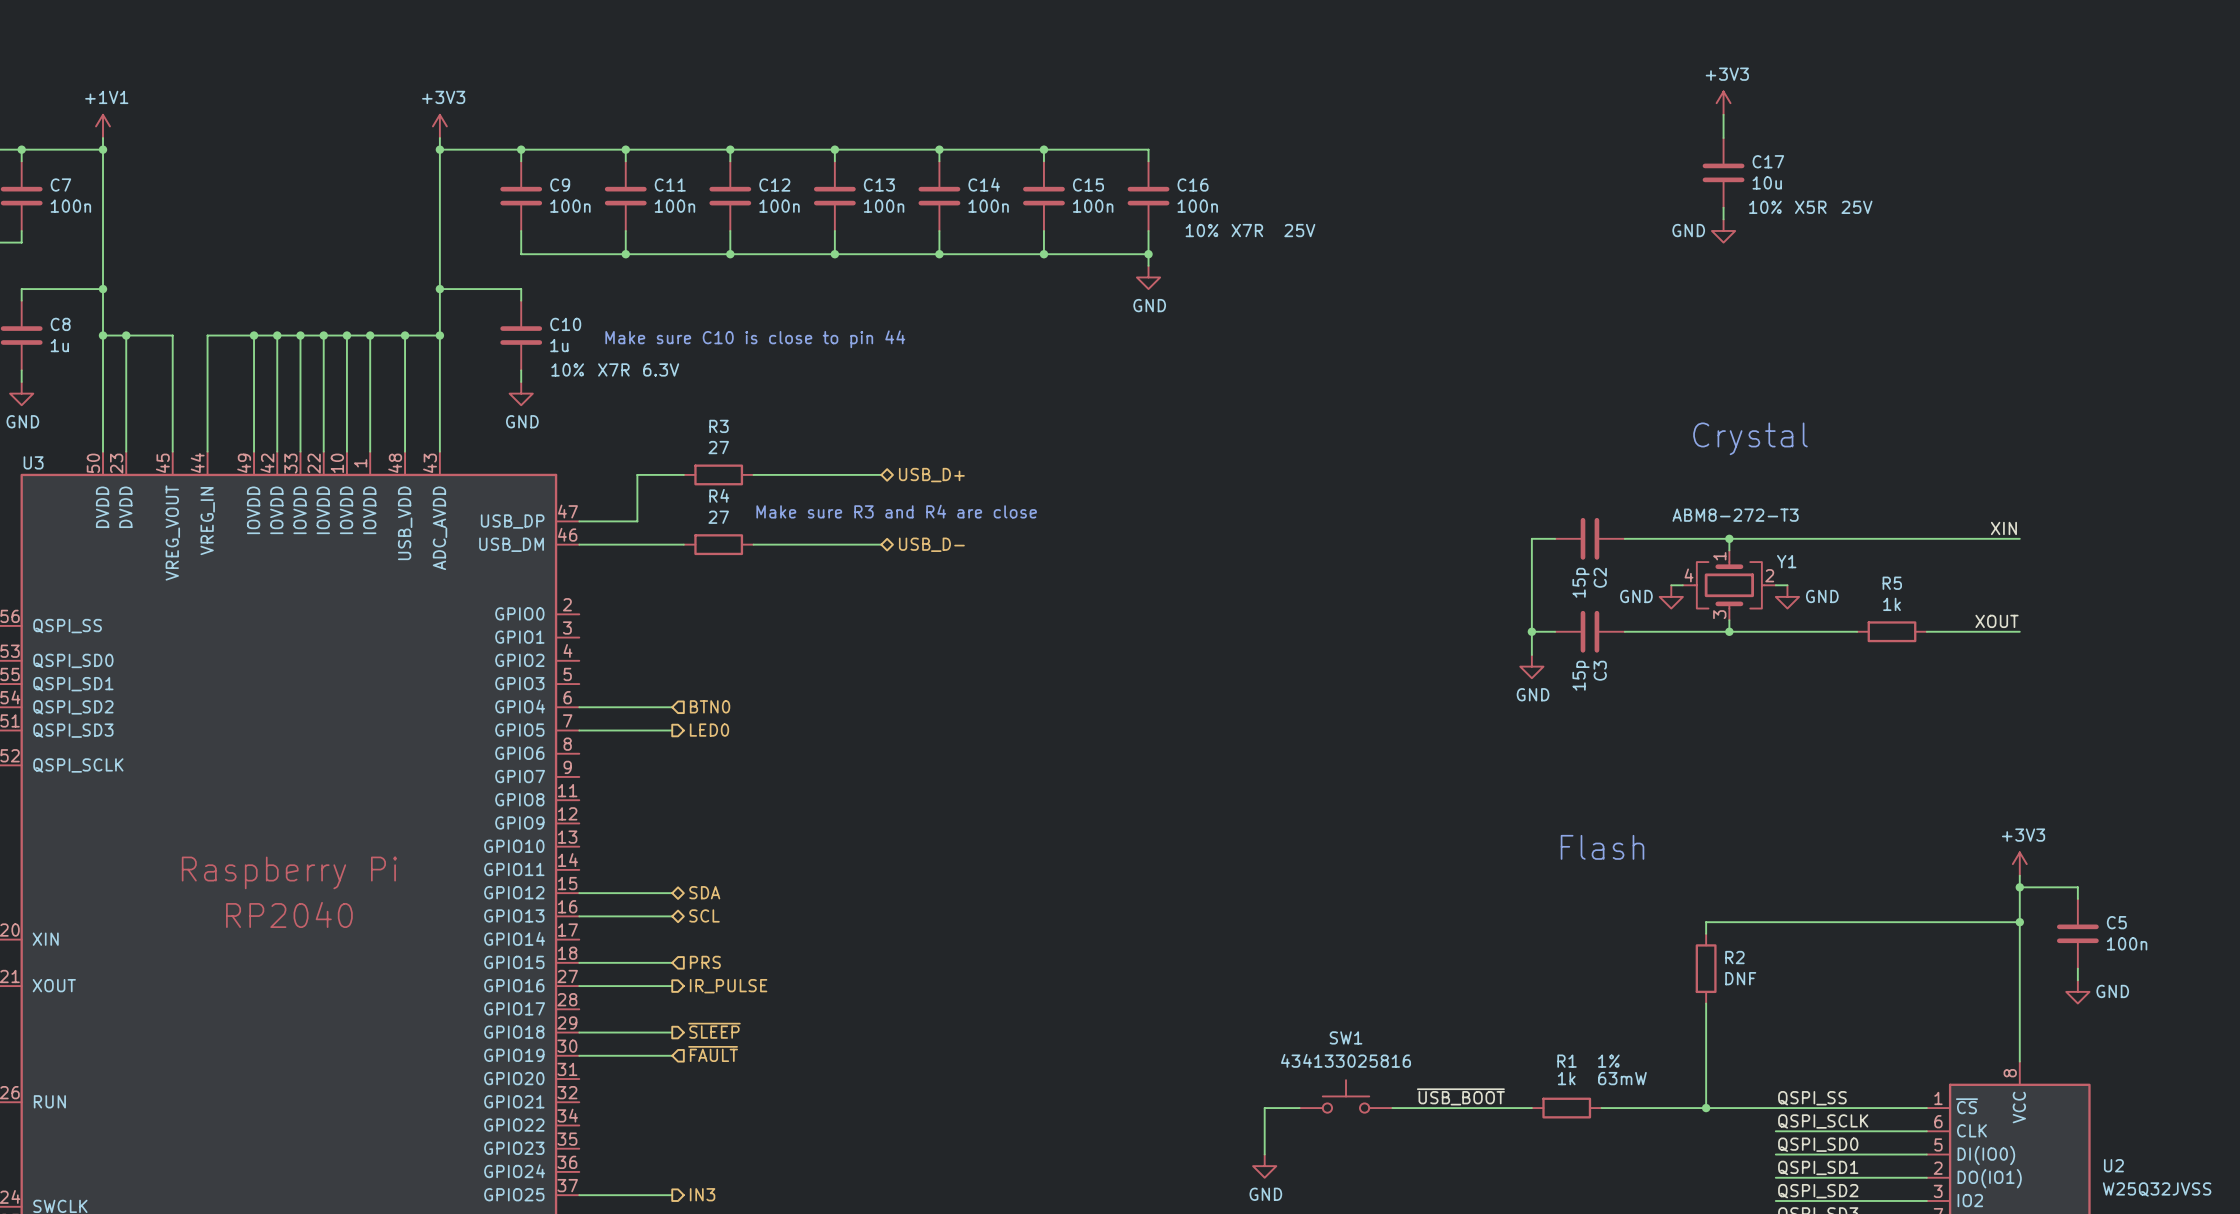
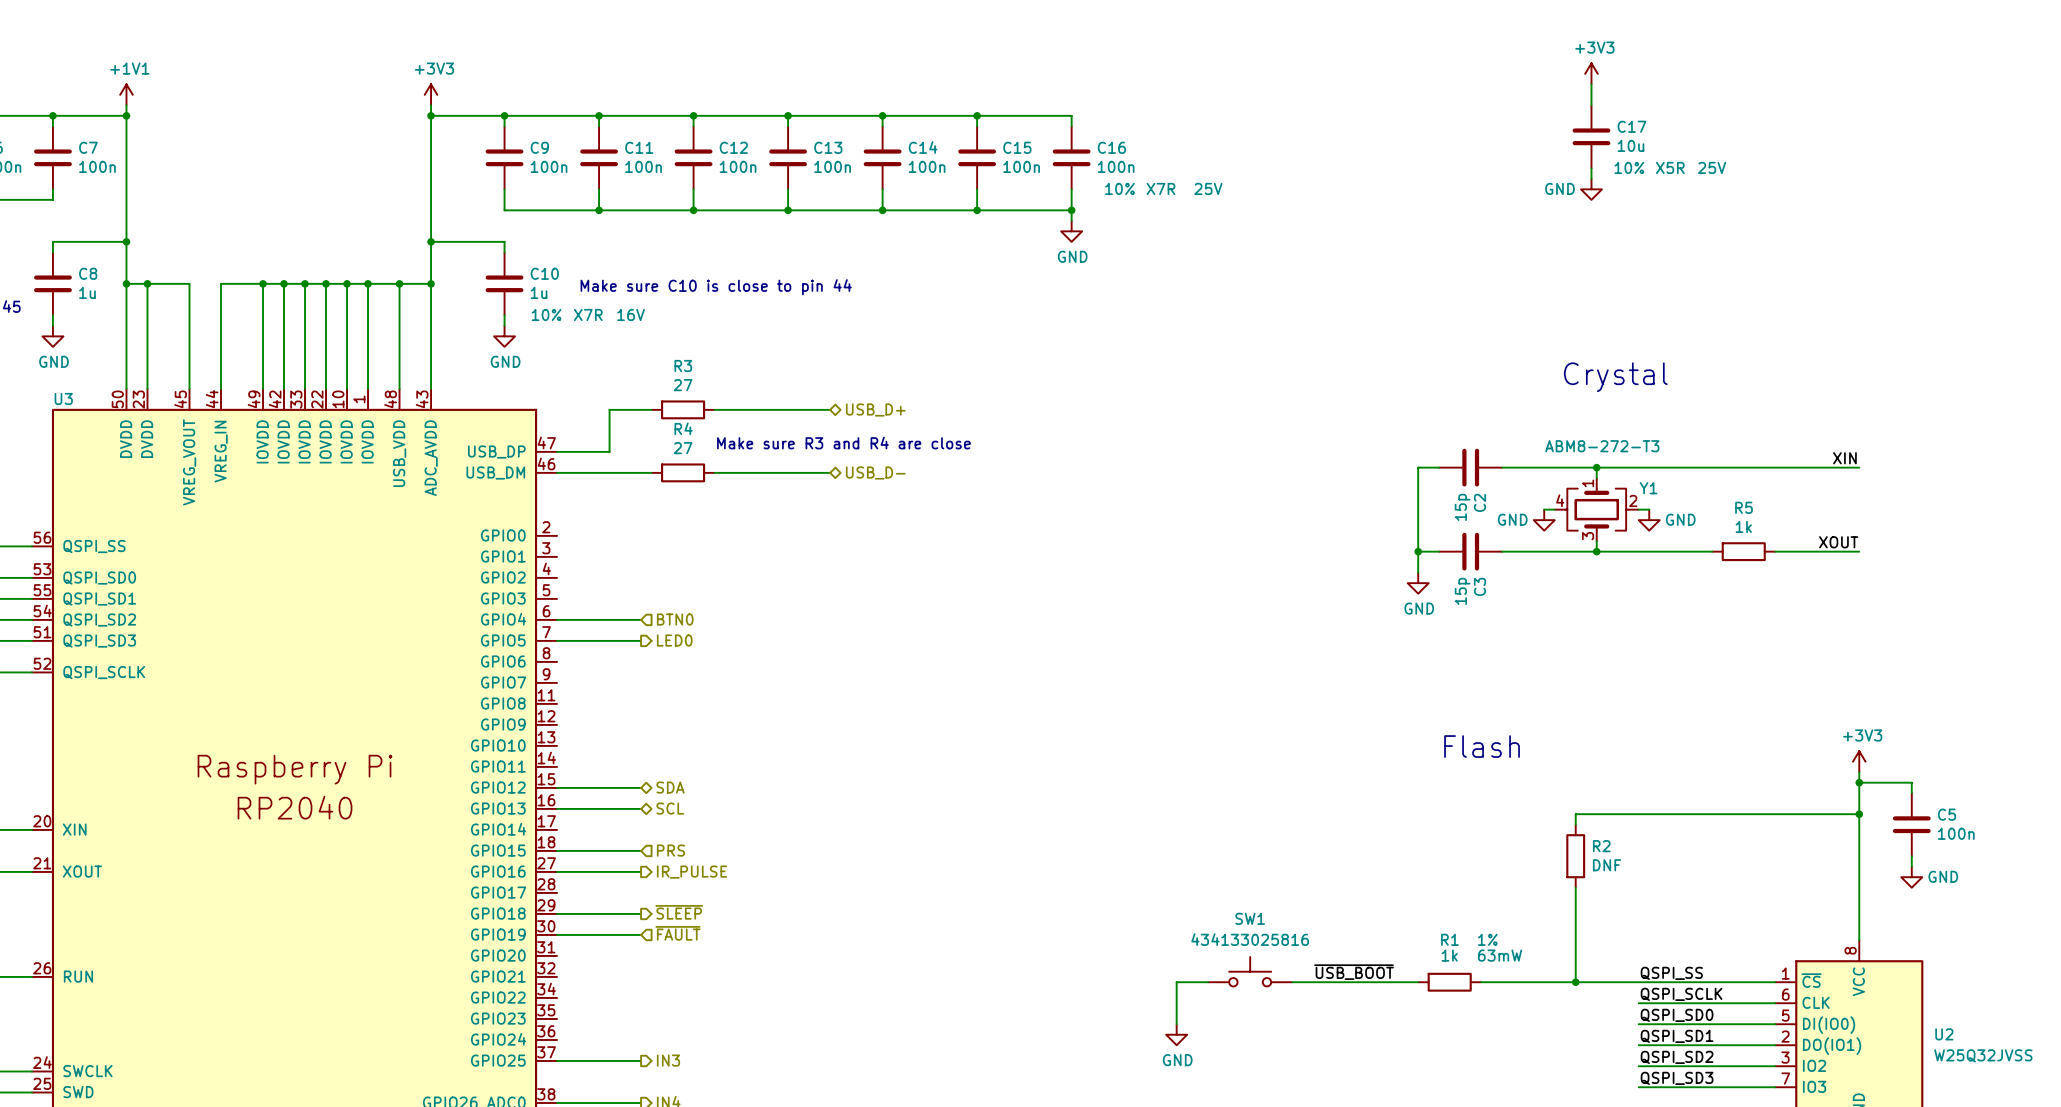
C10 text: 6.3V (661, 369) -> 16V (631, 314)

